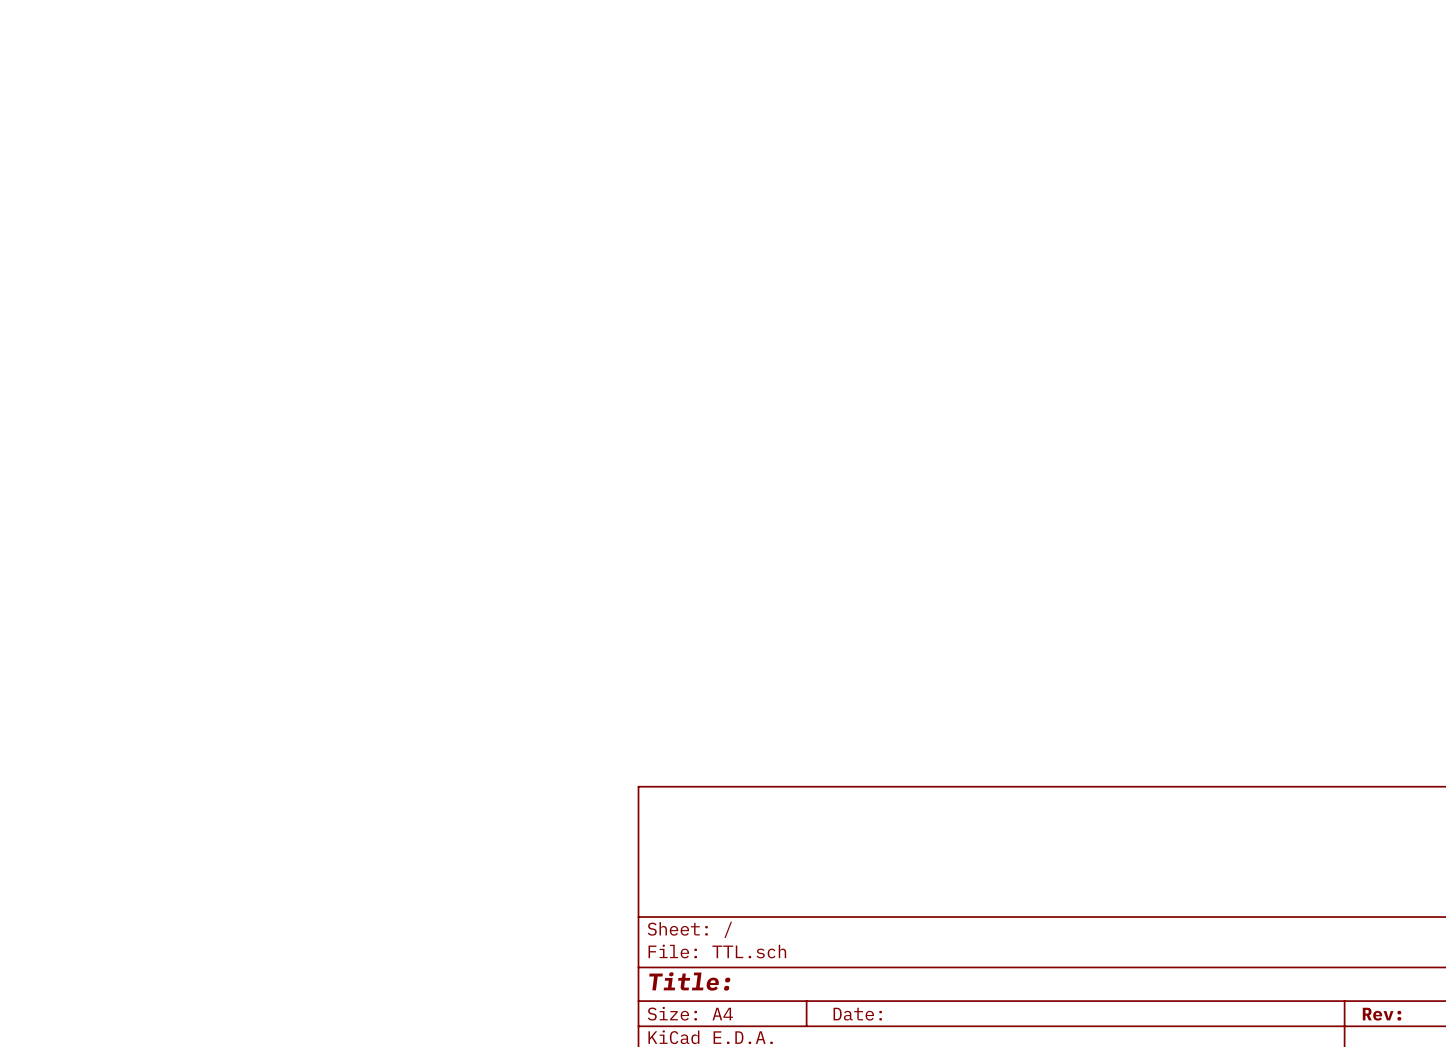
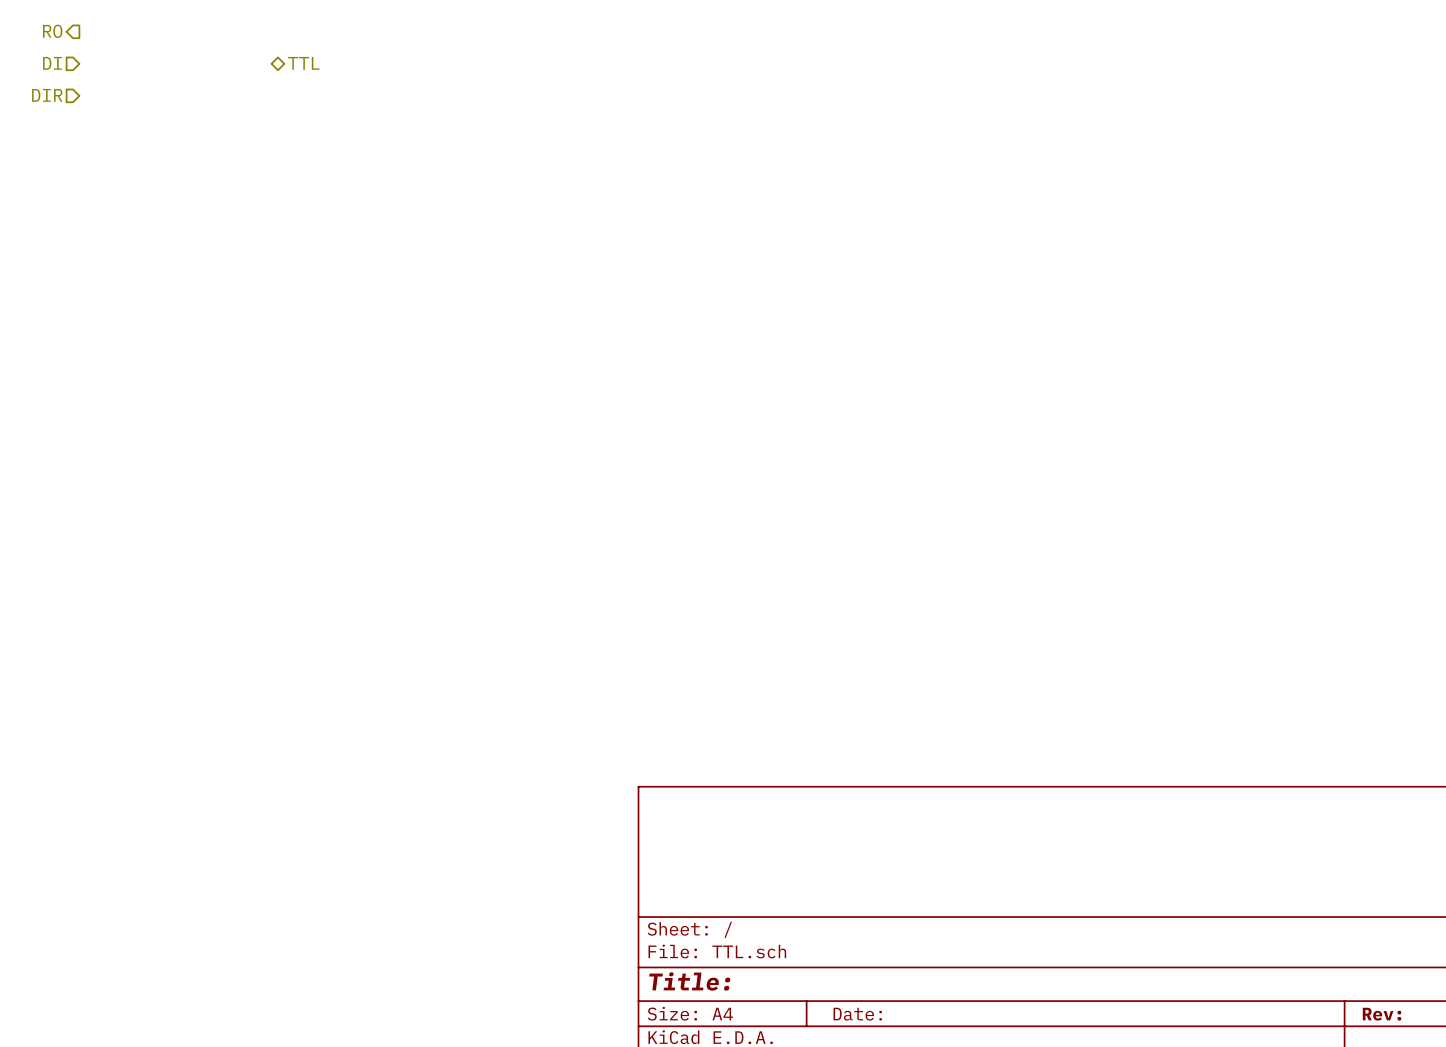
hierarchical label: none -> RO (52, 31)
hierarchical label: none -> DI (52, 63)
hierarchical label: none -> TTL (303, 63)
hierarchical label: none -> DIR (47, 95)

